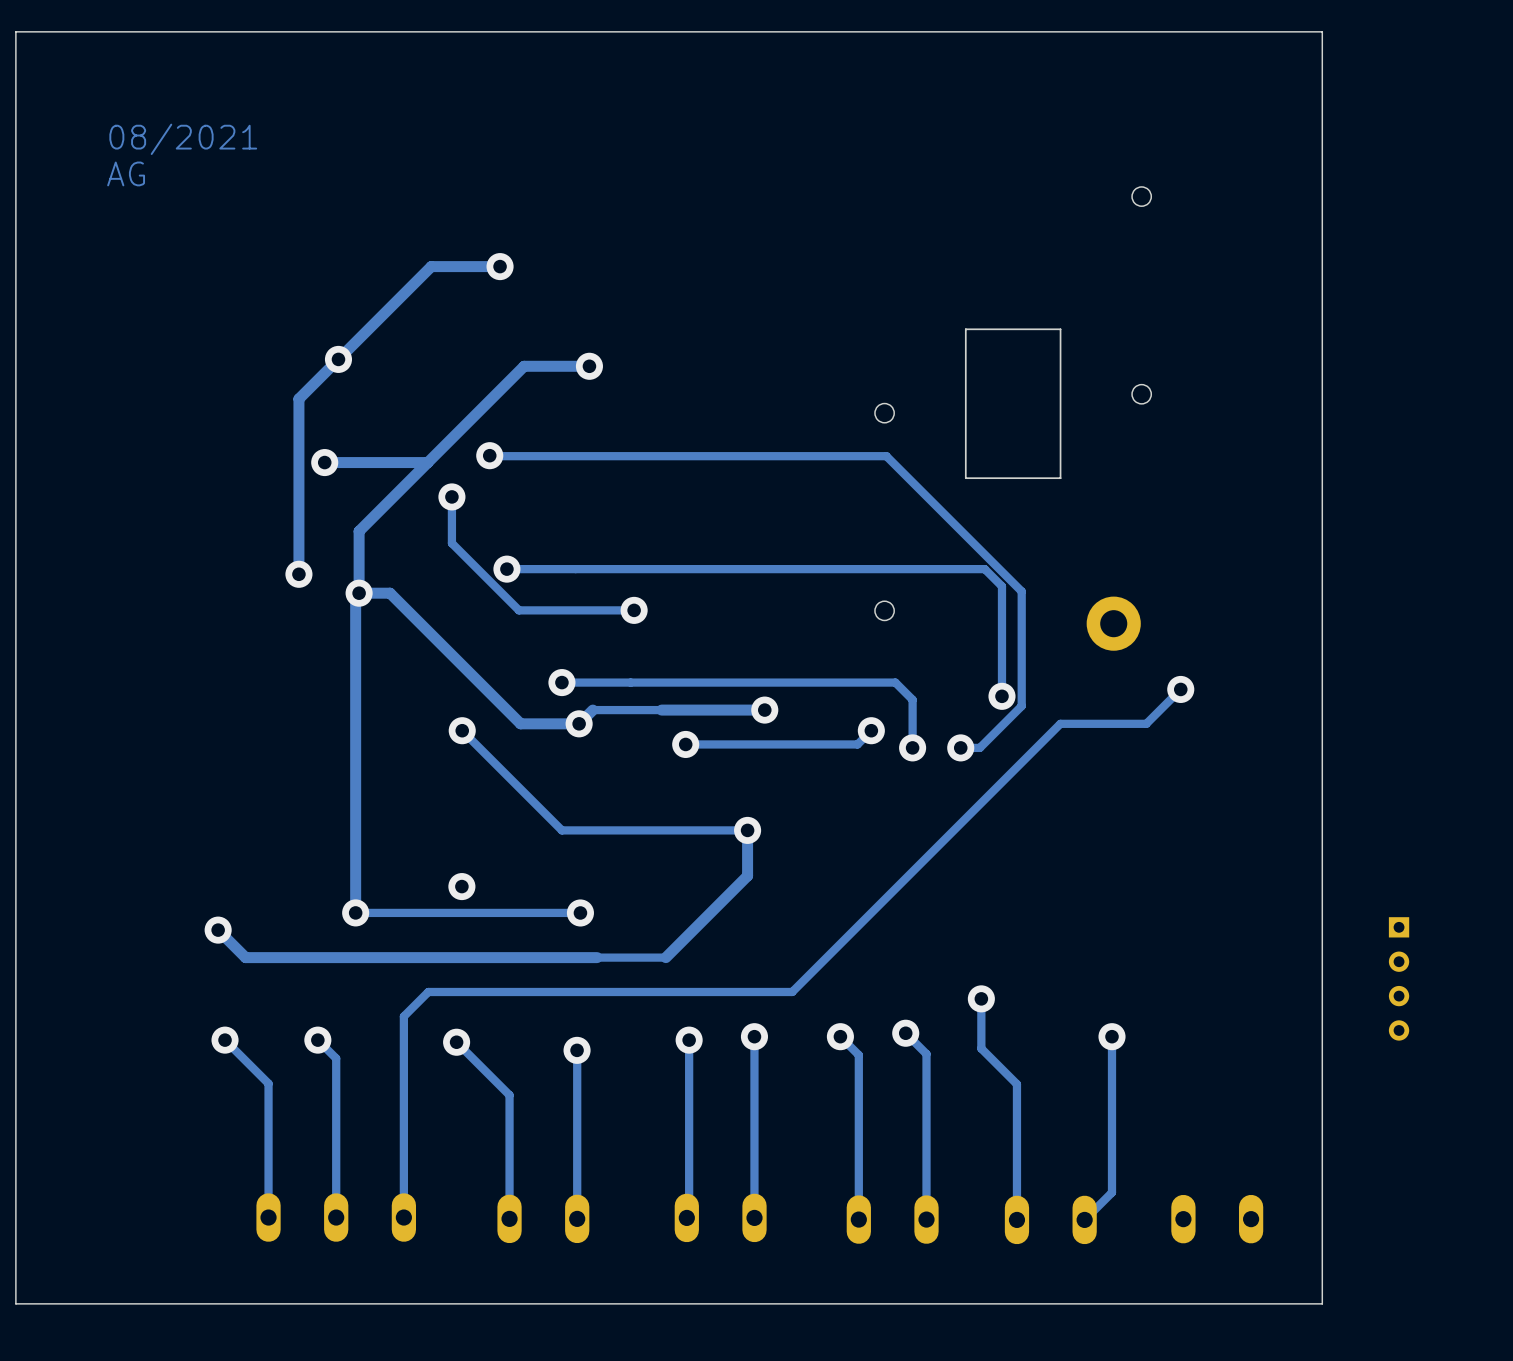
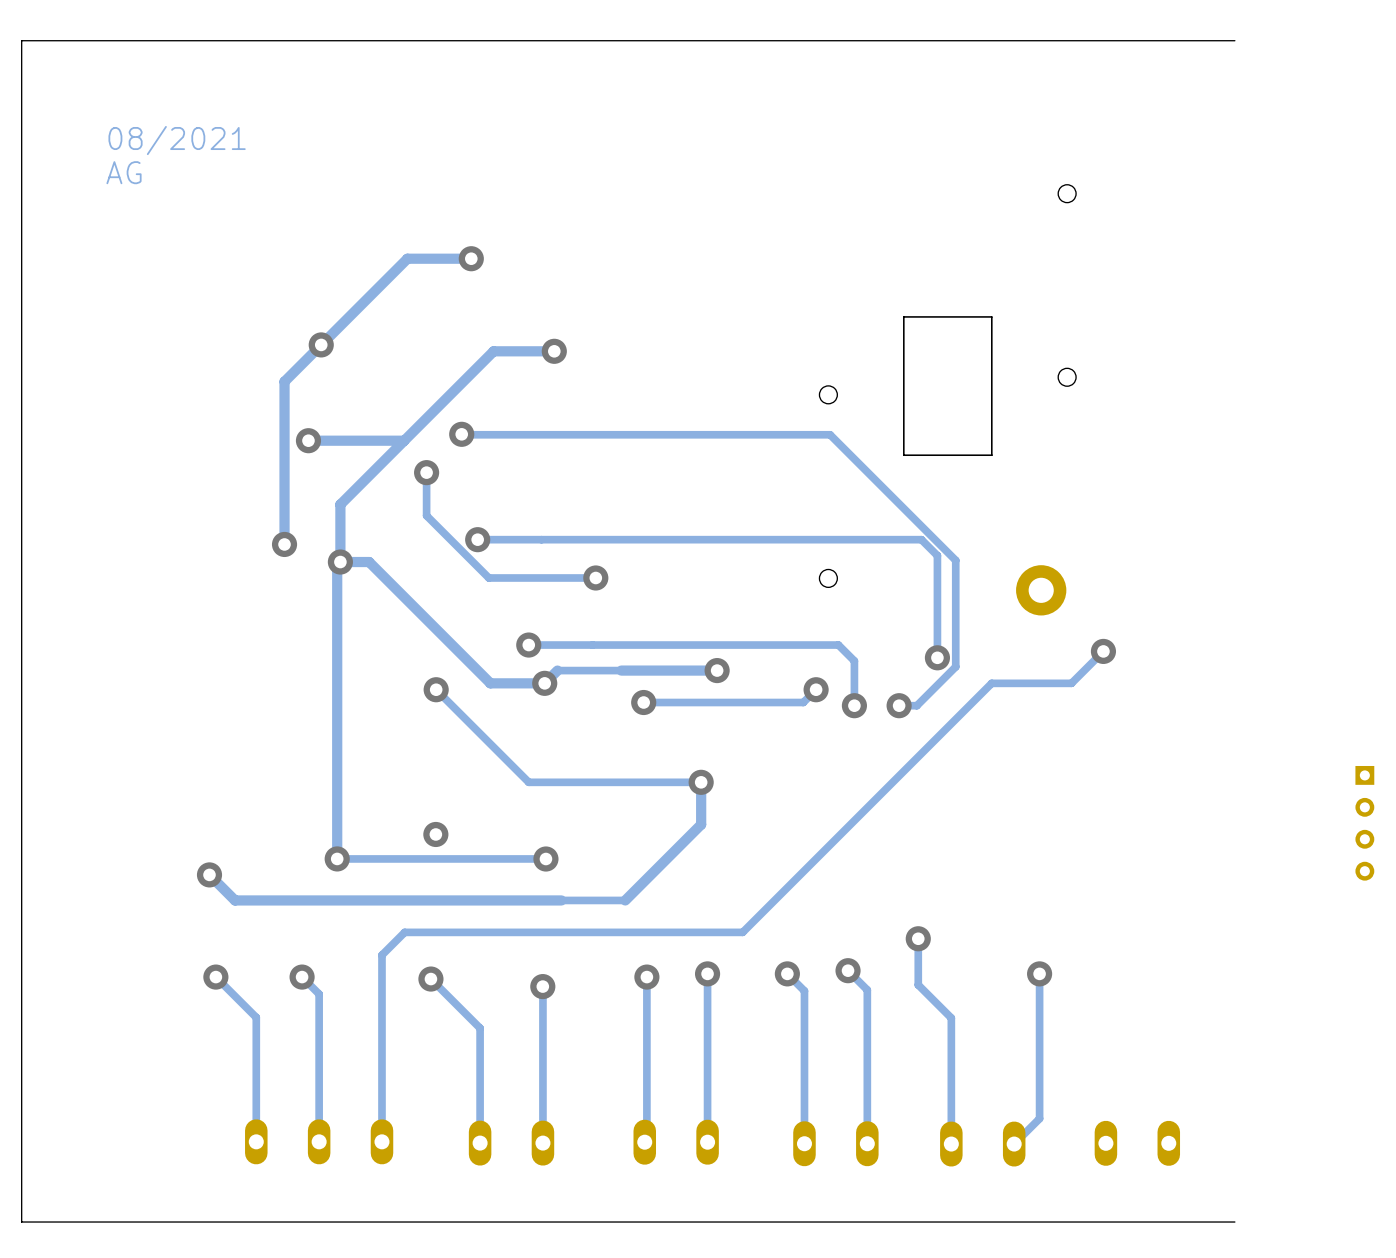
board edge: (1322, 31) (1322, 1303) -> none
part position: (1399, 978) -> (1364, 823)

